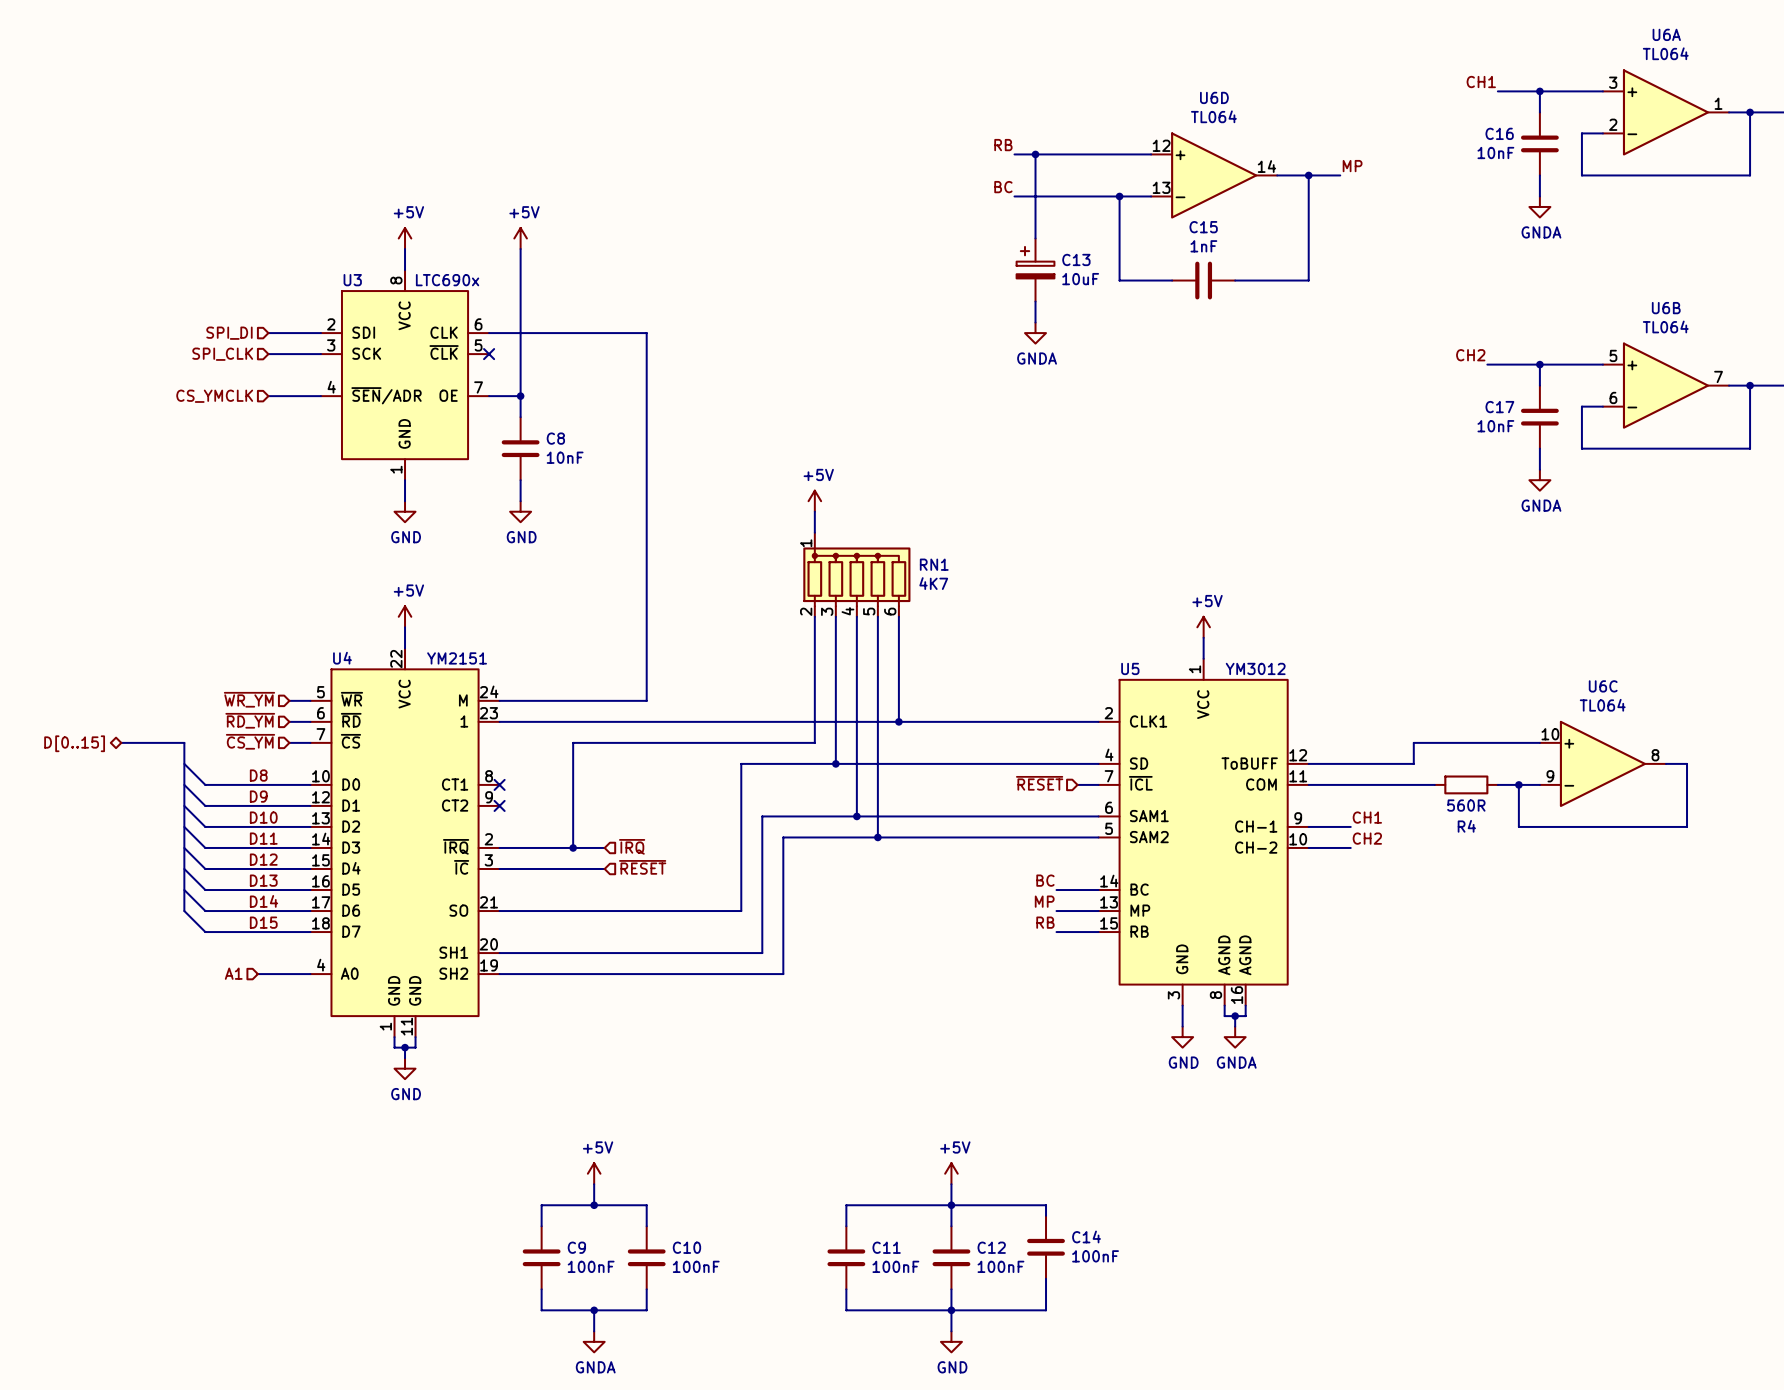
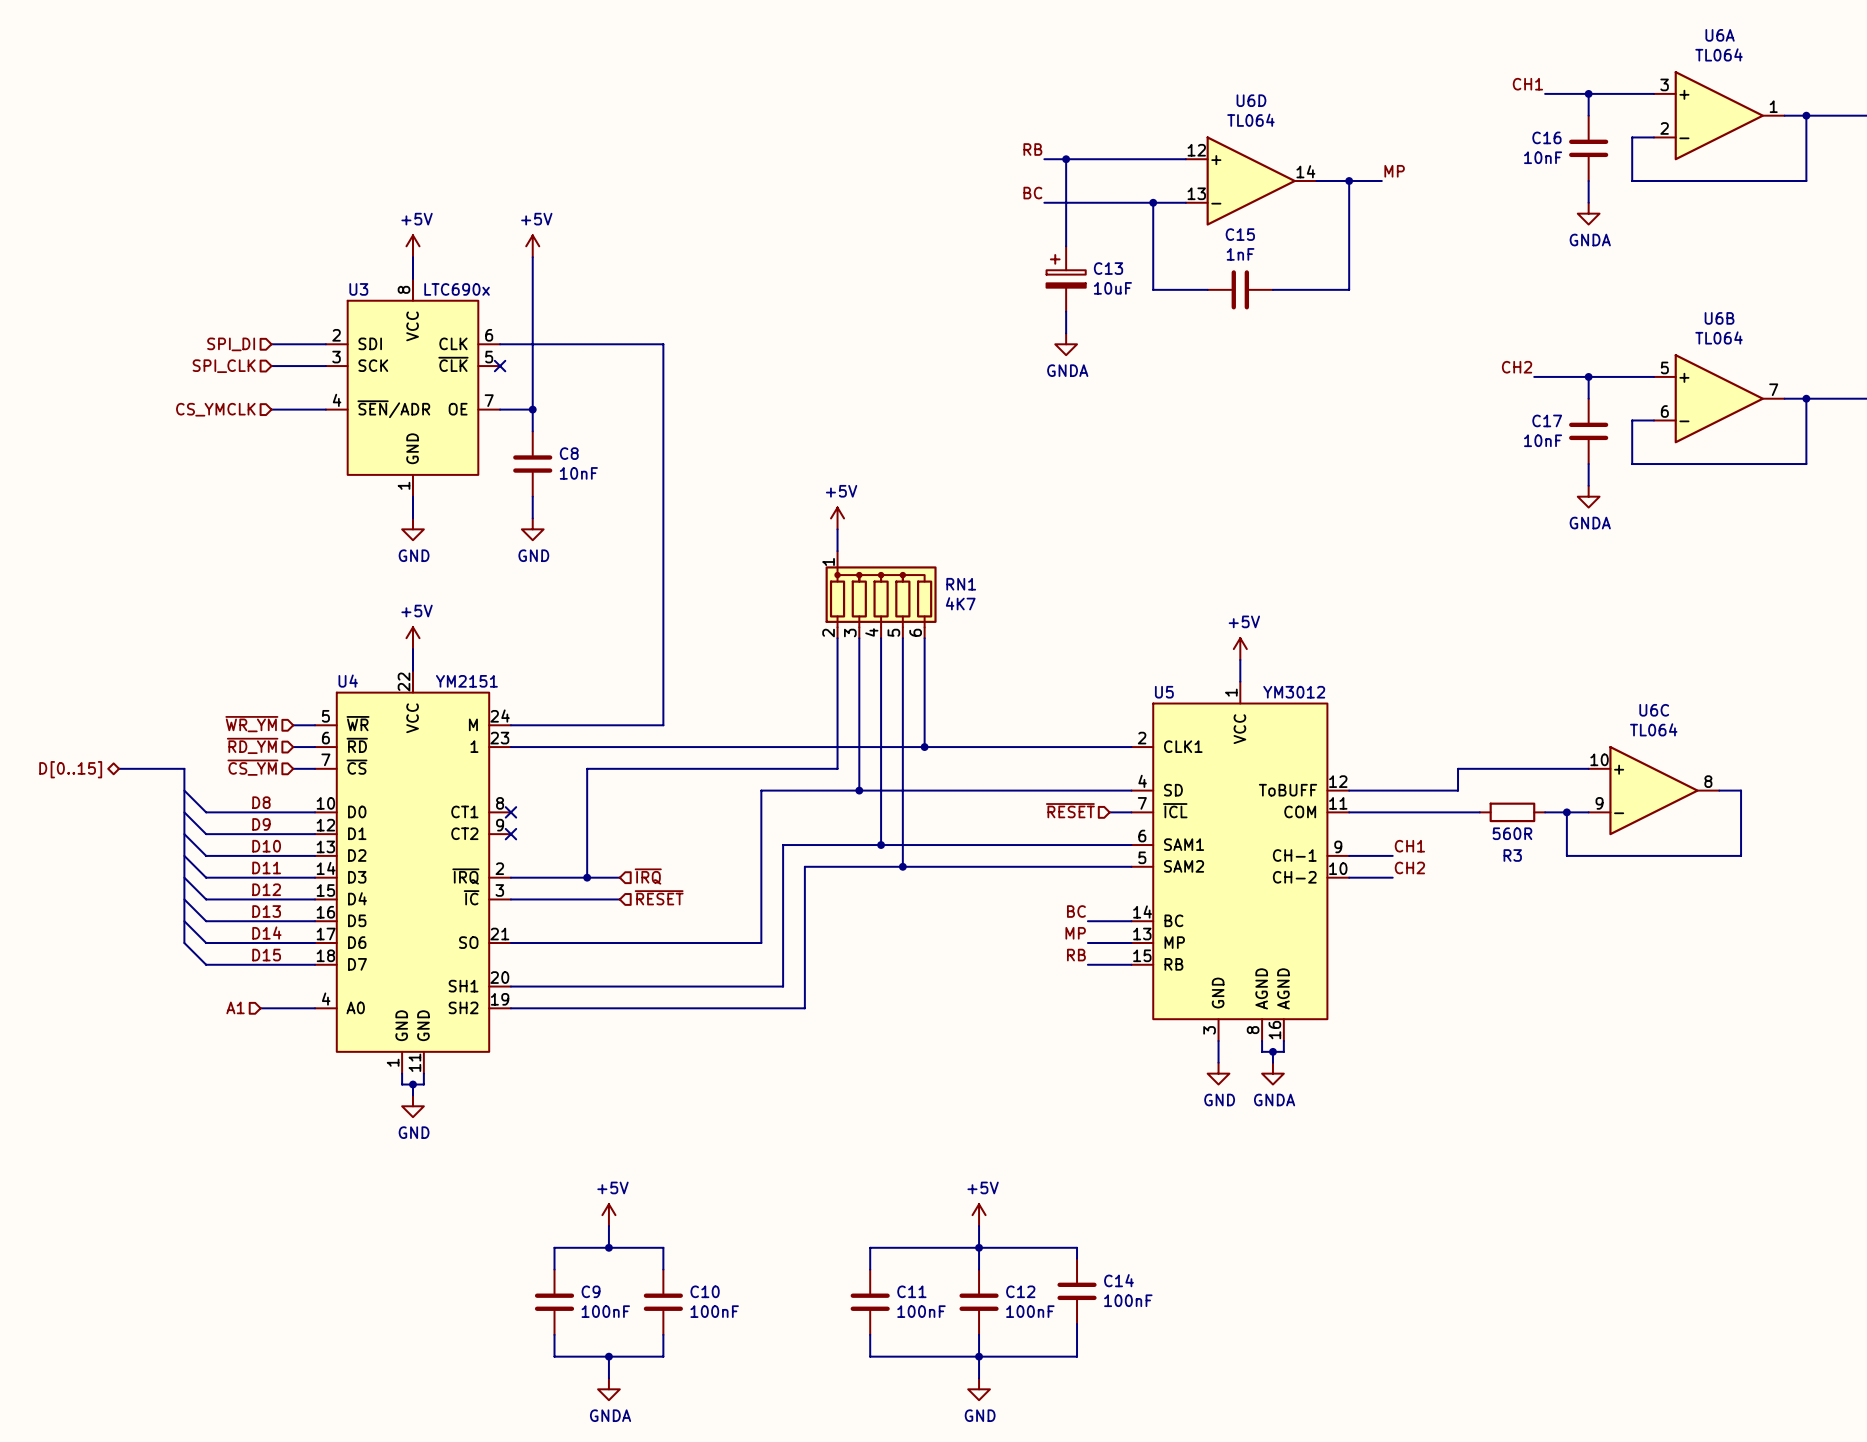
R4 name: R4 (1466, 826) -> R3 (1512, 855)

